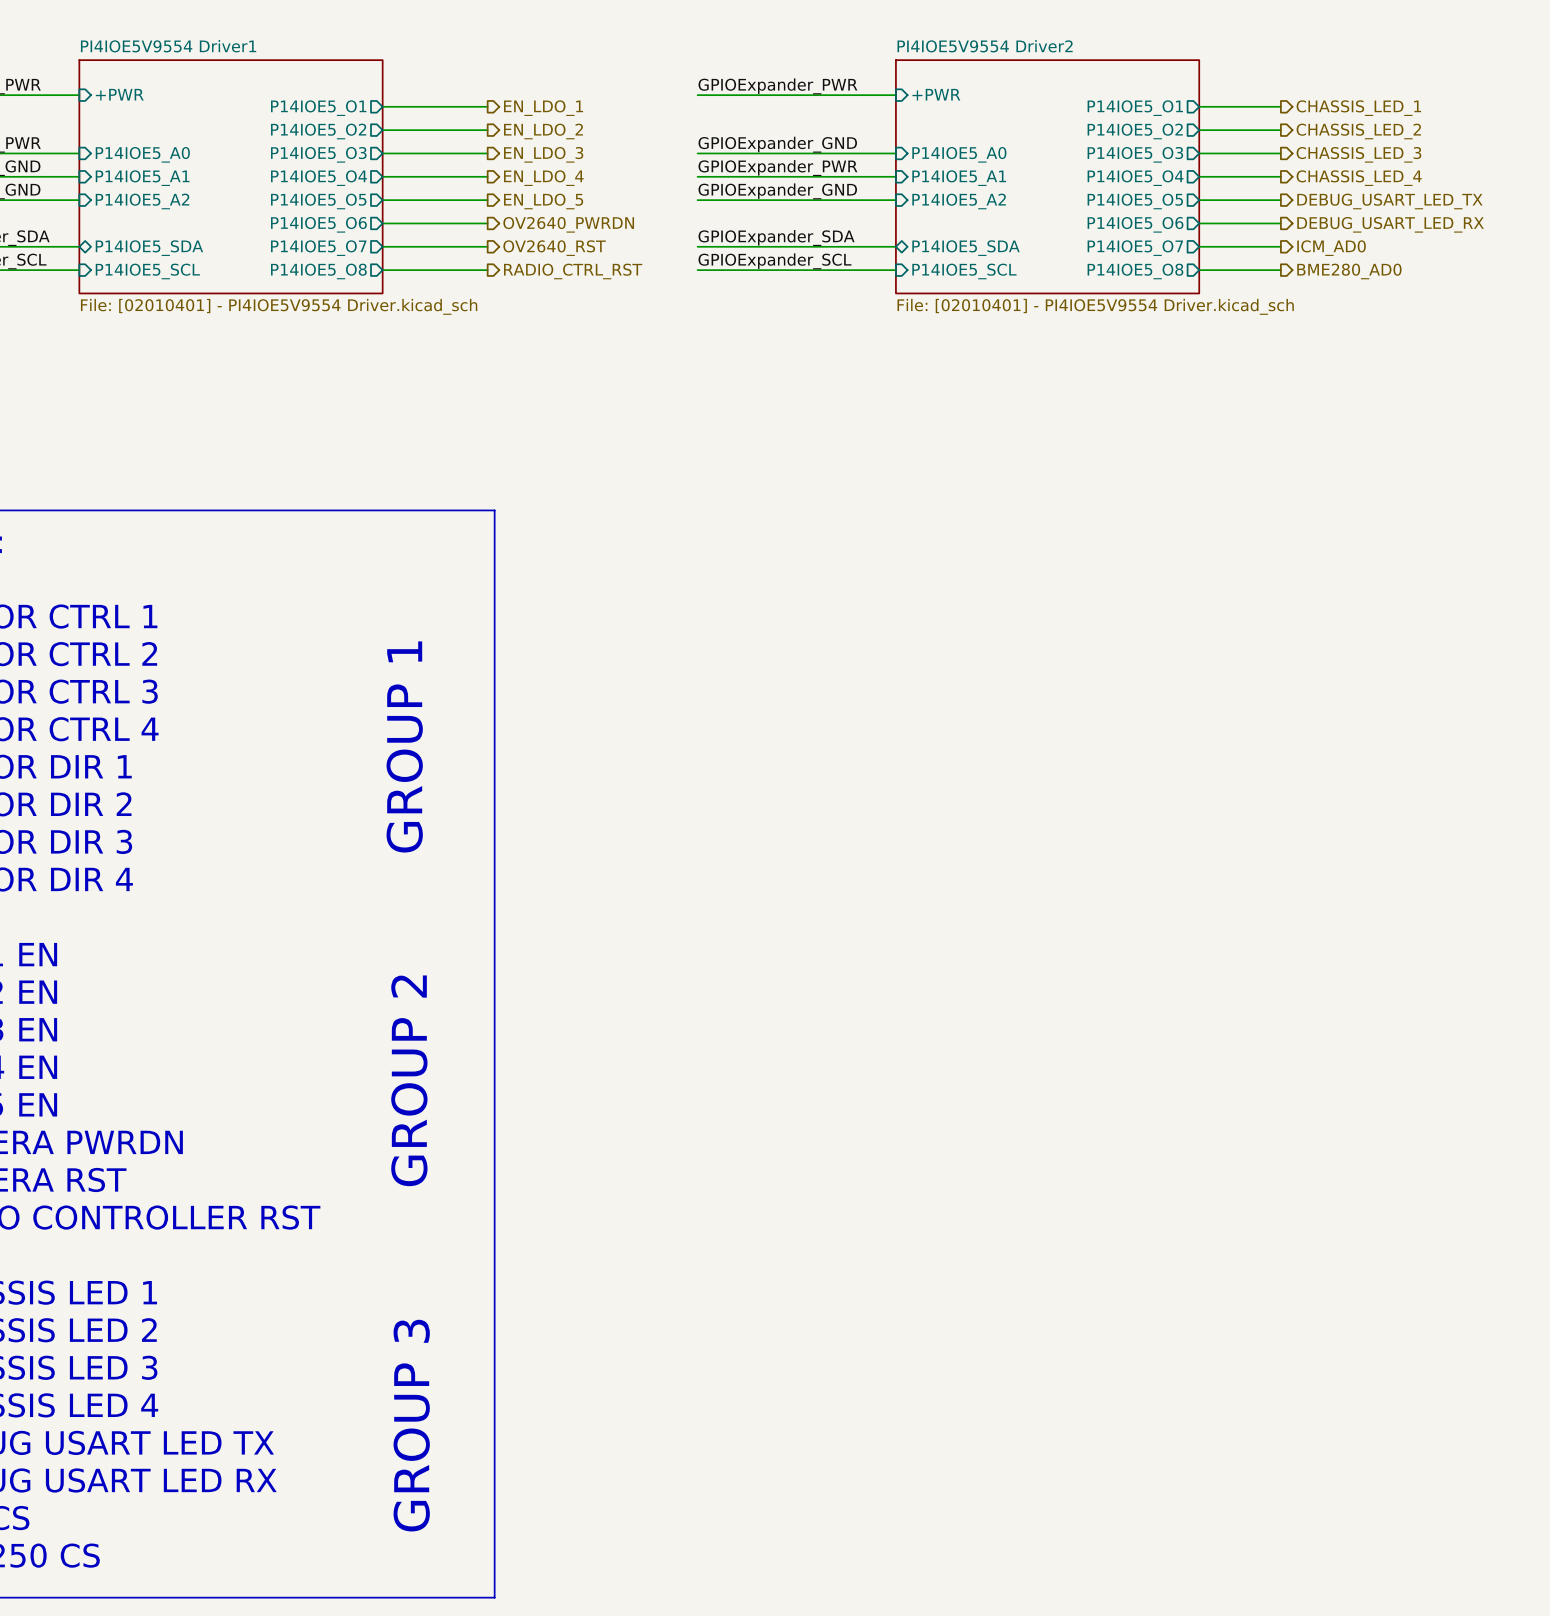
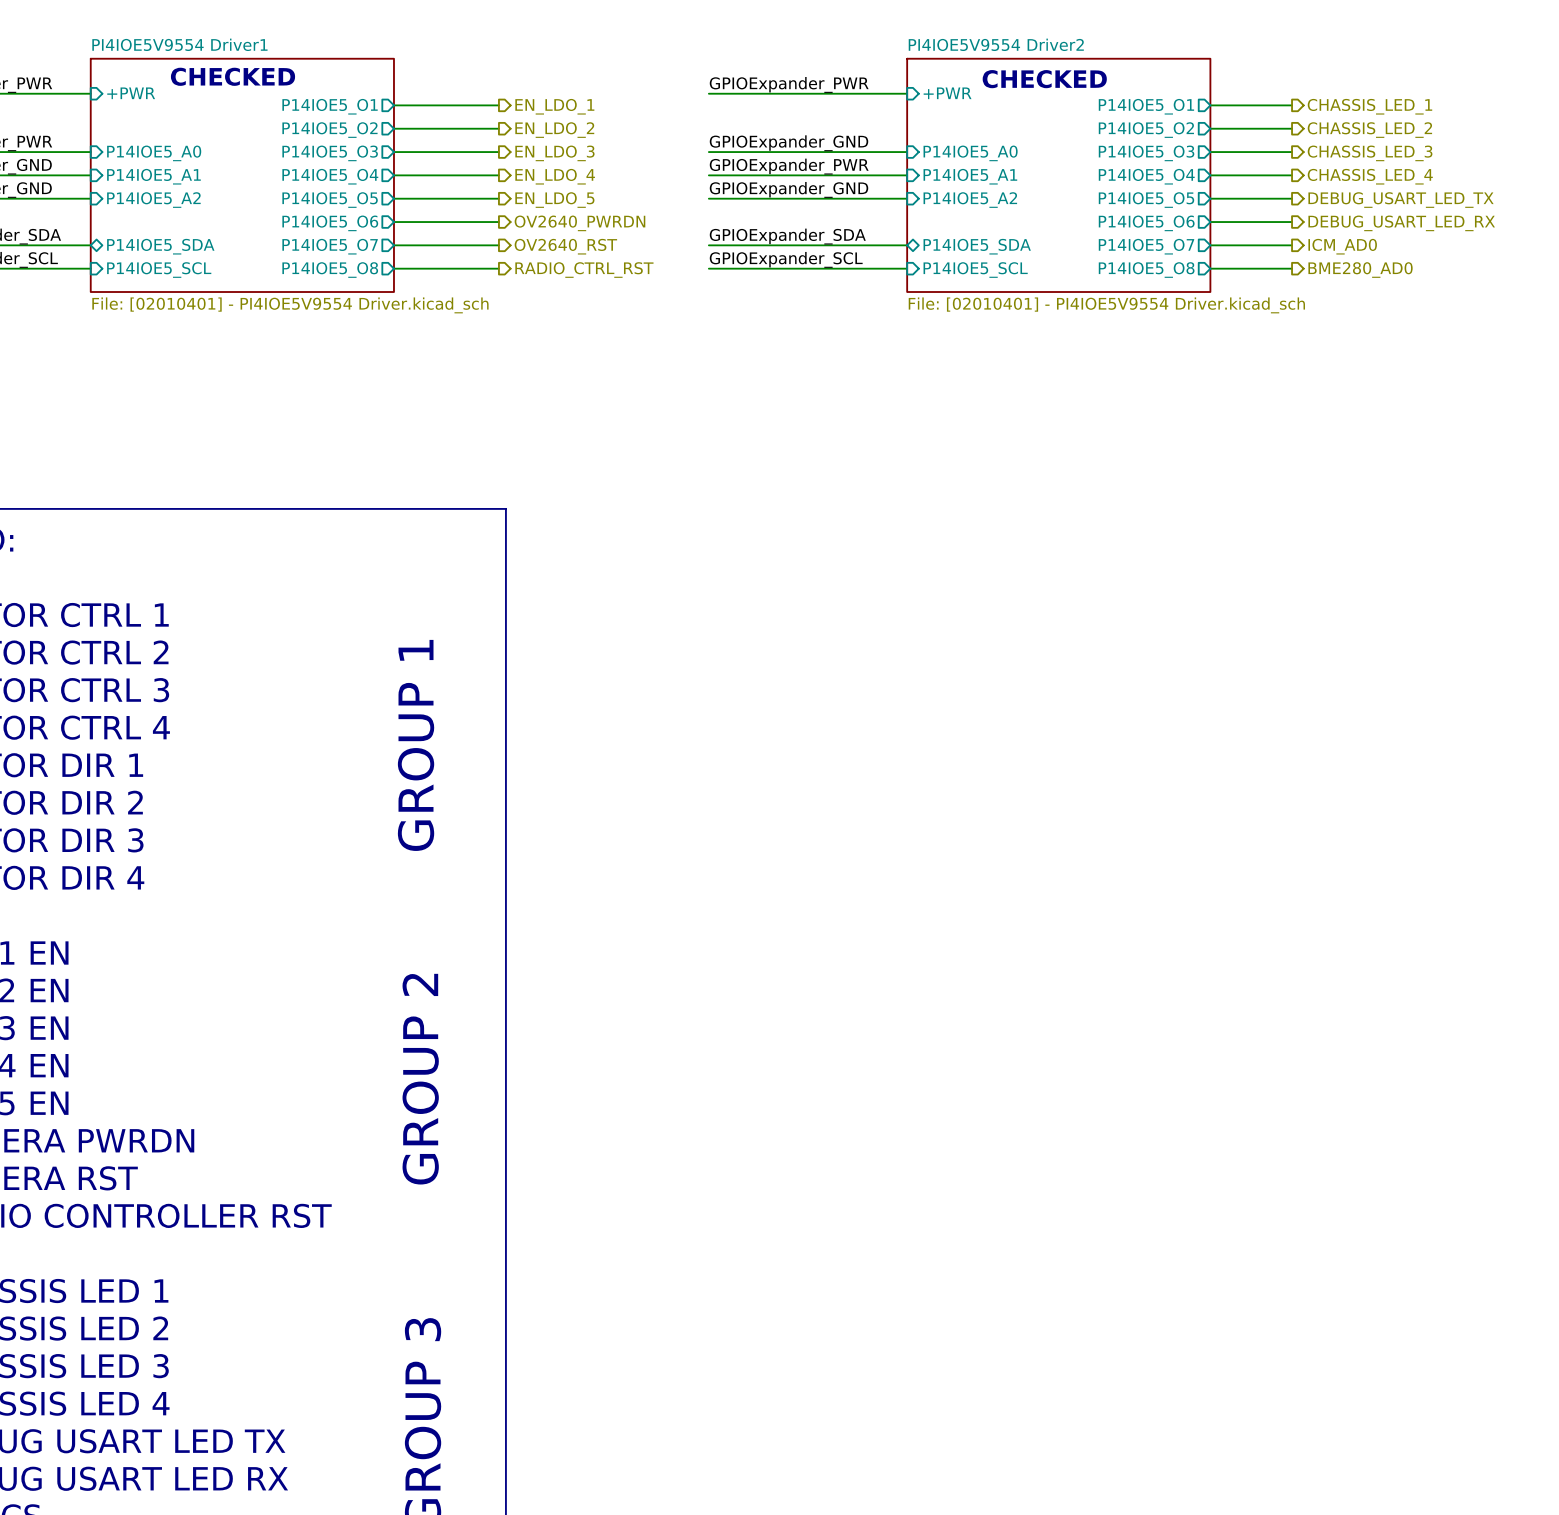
text: none -> CHECKED (233, 76)
text: none -> CHECKED (1044, 79)

